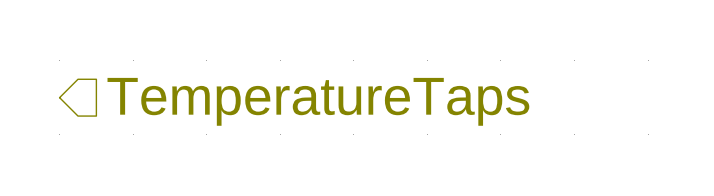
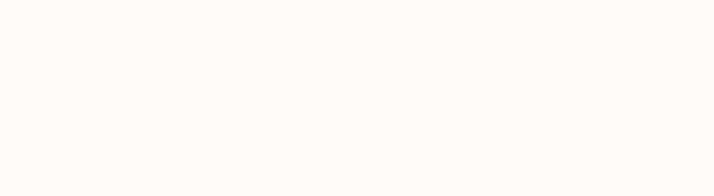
hierarchical label: TemperatureTaps (318, 101) -> none

